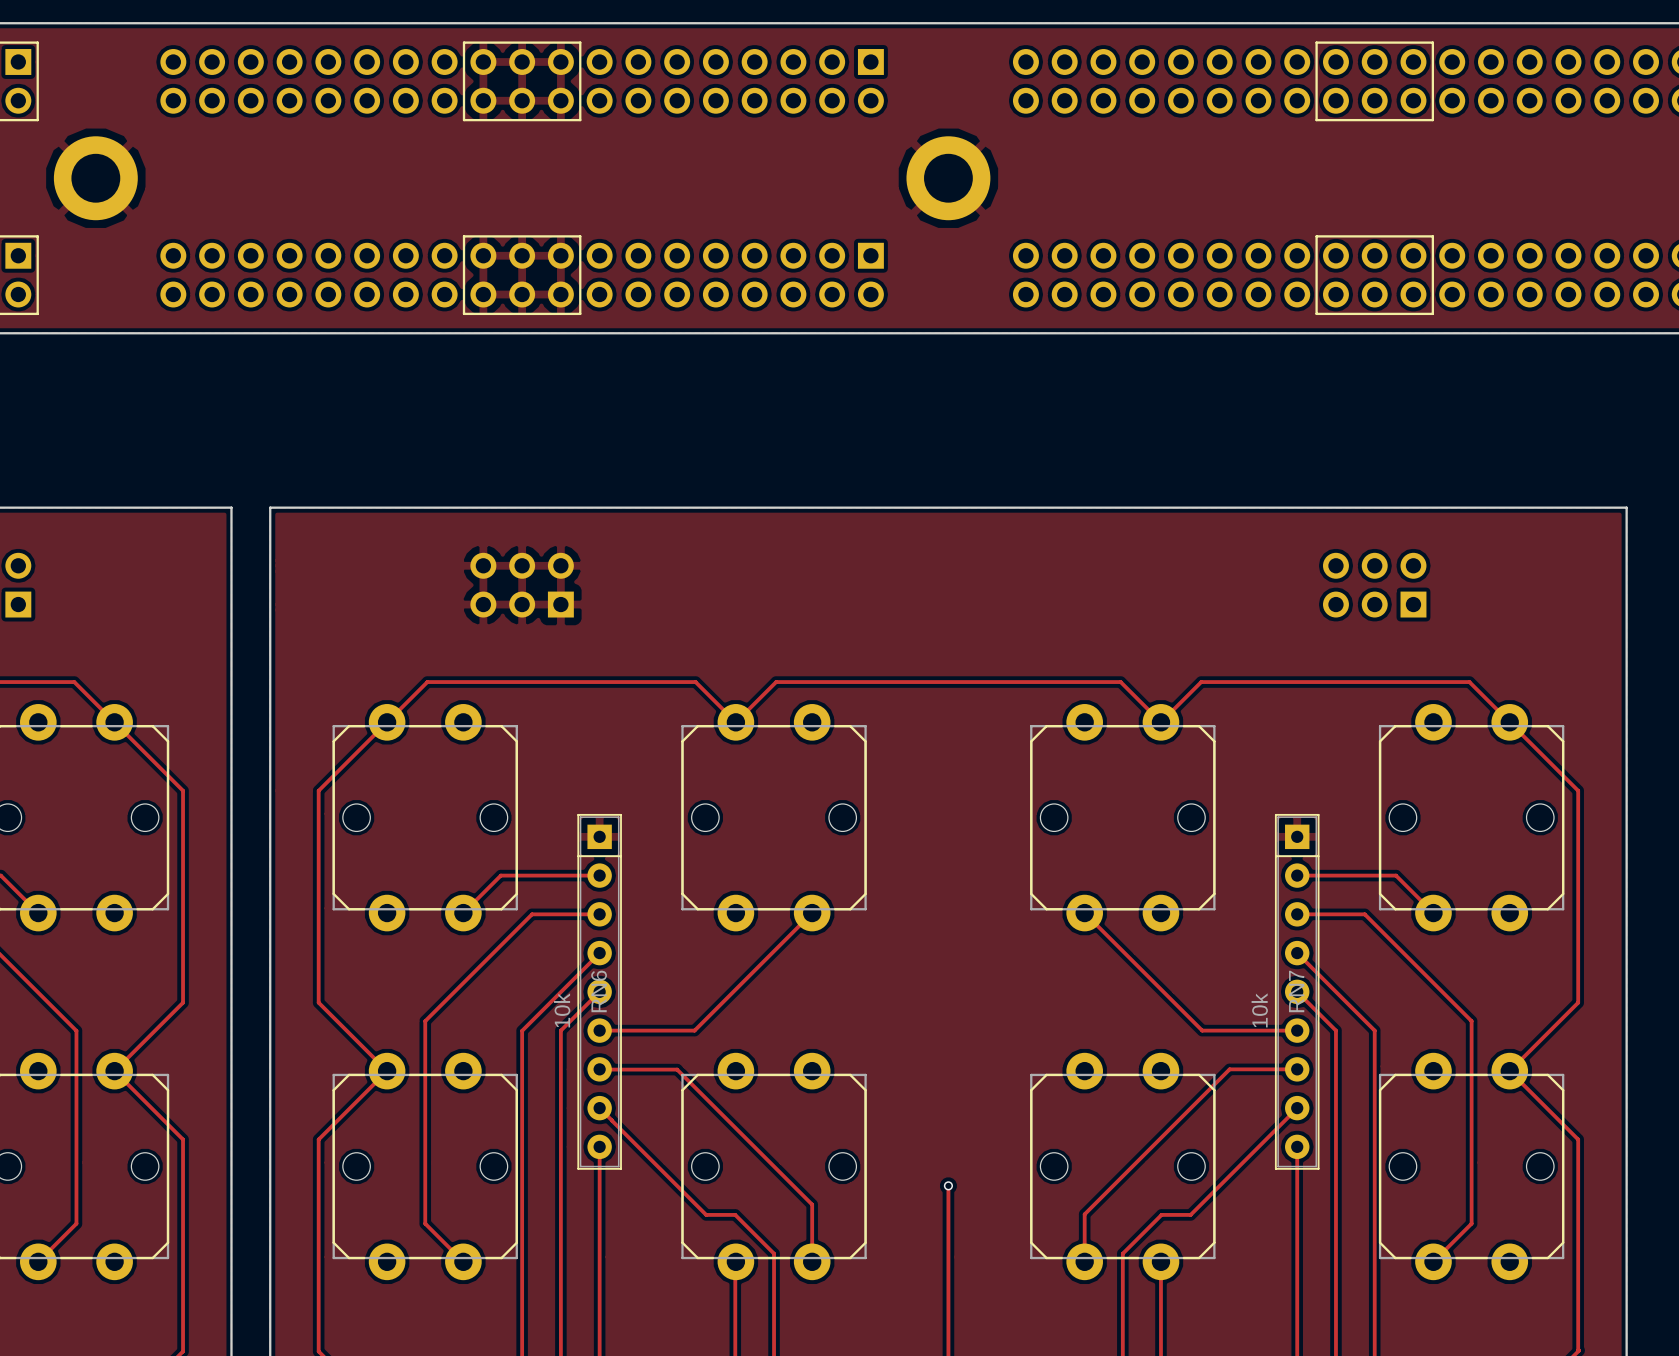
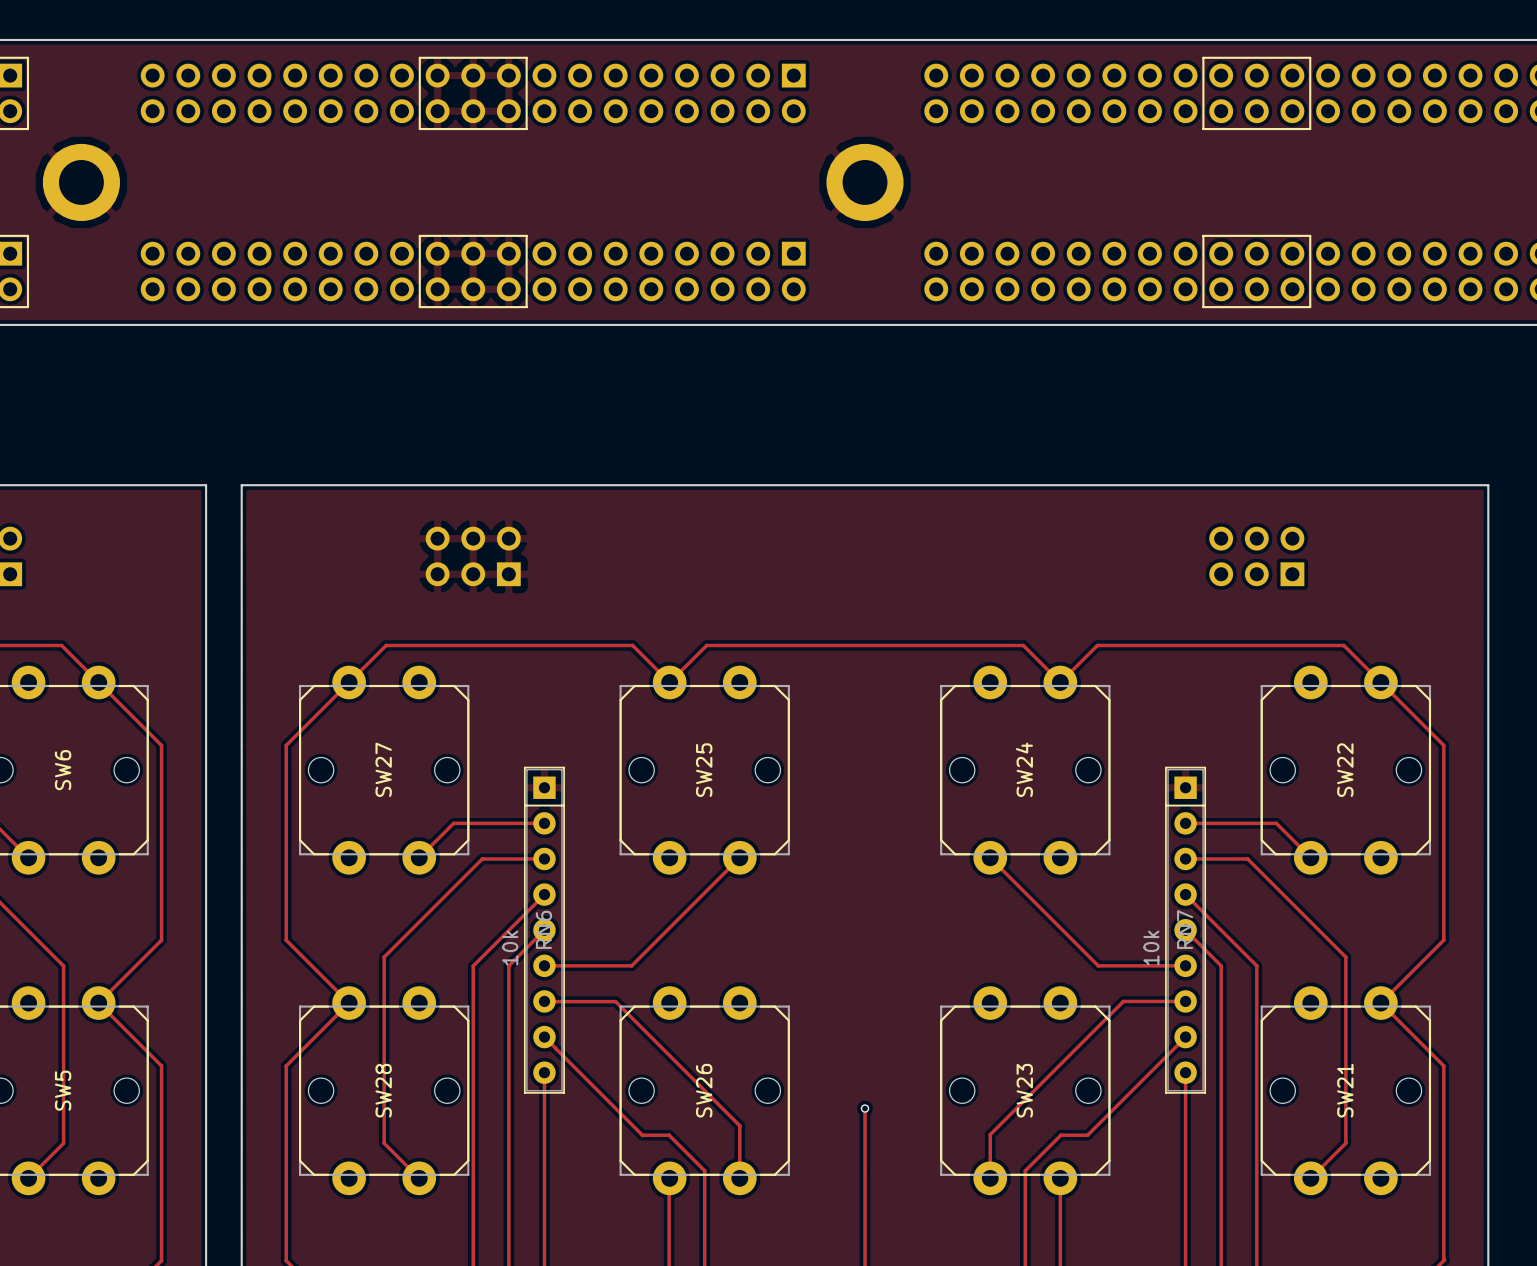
SW6 name: none -> SW6 (63, 770)
SW27 name: none -> SW27 (383, 769)
SW25 name: none -> SW25 (704, 770)
SW24 name: none -> SW24 (1024, 769)
SW22 name: none -> SW22 (1345, 770)
SW5 name: none -> SW5 (63, 1090)
SW28 name: none -> SW28 (383, 1090)
SW26 name: none -> SW26 (704, 1090)
SW23 name: none -> SW23 (1024, 1090)
SW21 name: none -> SW21 (1345, 1090)

